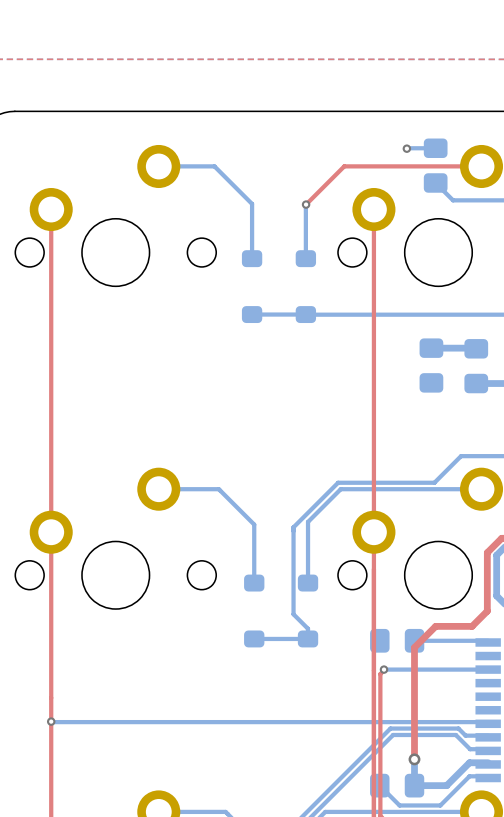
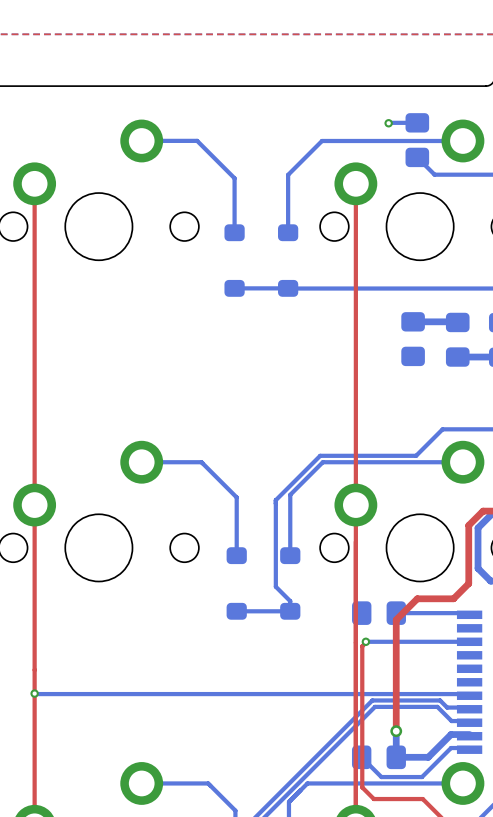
bottom track: none -> (462, 140) (322, 140) (288, 174) (288, 179)
top track: (483, 166) (344, 166) (306, 204) -> none
via: (306, 204) -> none

